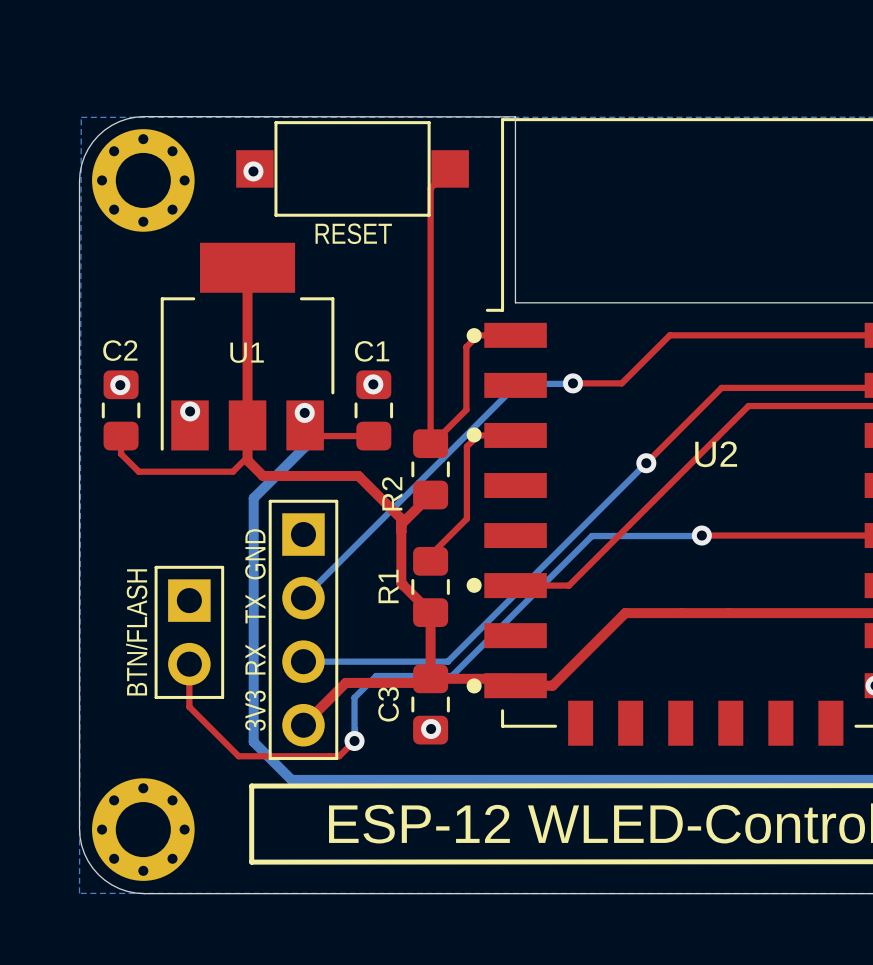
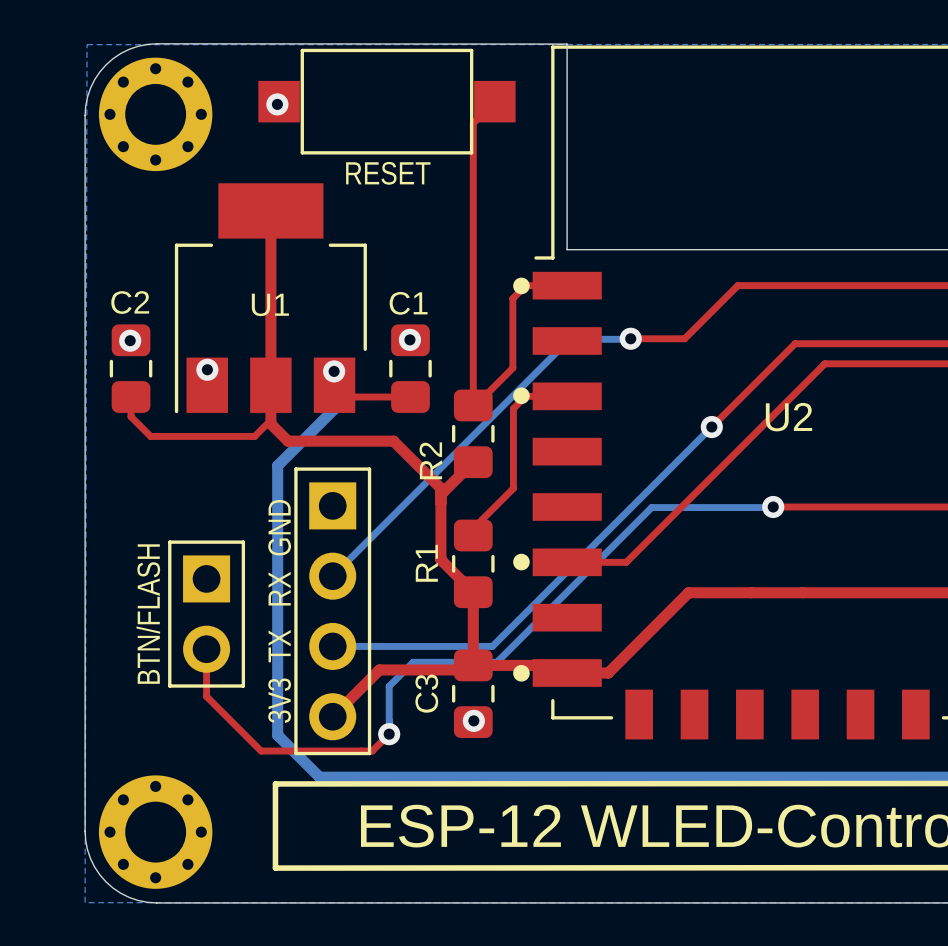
text: 3V3 RX TX GND (255, 630) -> 3V3 TX RX GND (279, 611)

